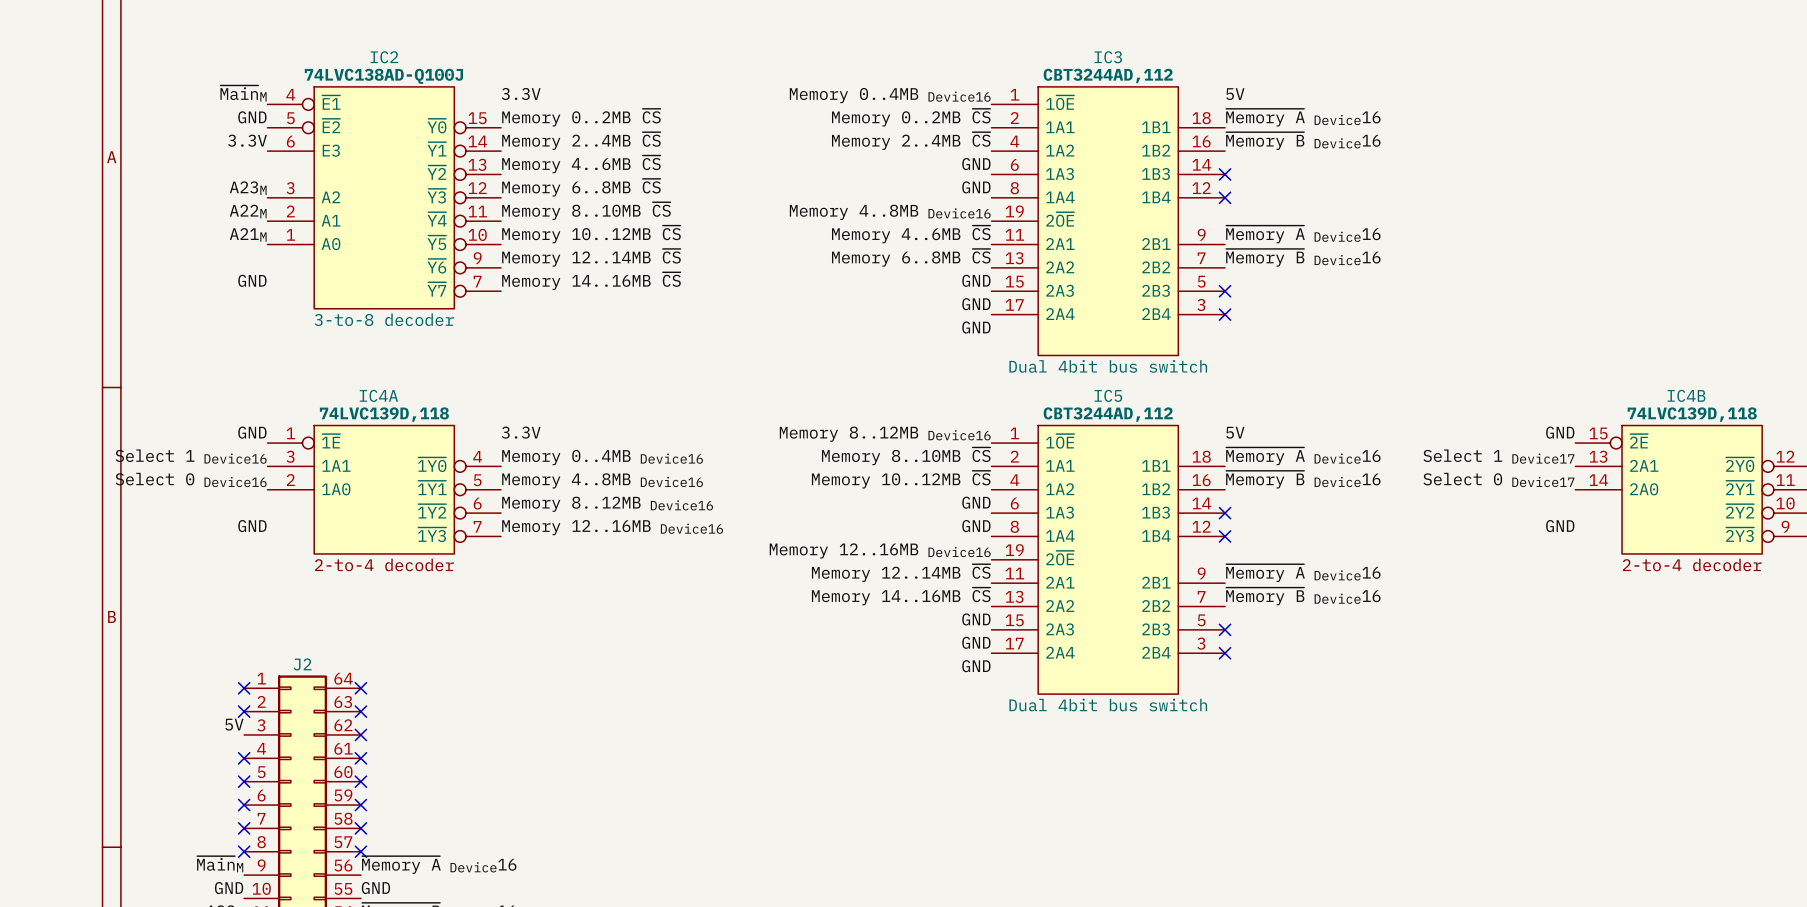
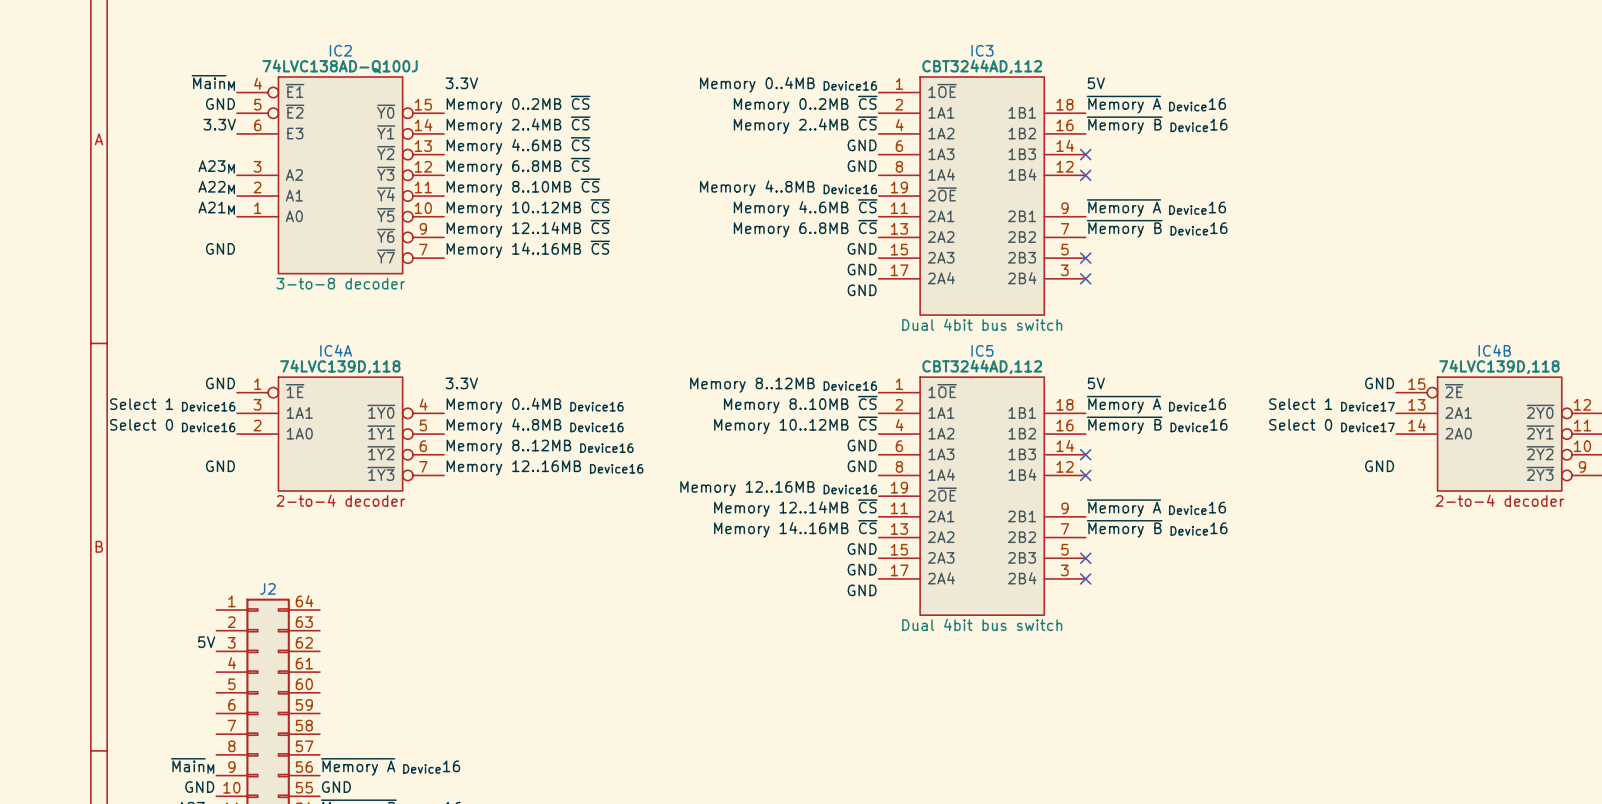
no-connect mark: (244, 688) -> none
no-connect mark: (360, 688) -> none
no-connect mark: (244, 711) -> none
no-connect mark: (360, 711) -> none
no-connect mark: (360, 734) -> none
no-connect mark: (244, 758) -> none
no-connect mark: (360, 758) -> none
no-connect mark: (244, 781) -> none
no-connect mark: (360, 781) -> none
no-connect mark: (244, 805) -> none
no-connect mark: (360, 805) -> none
no-connect mark: (244, 828) -> none
no-connect mark: (360, 828) -> none
no-connect mark: (244, 851) -> none
no-connect mark: (360, 851) -> none

